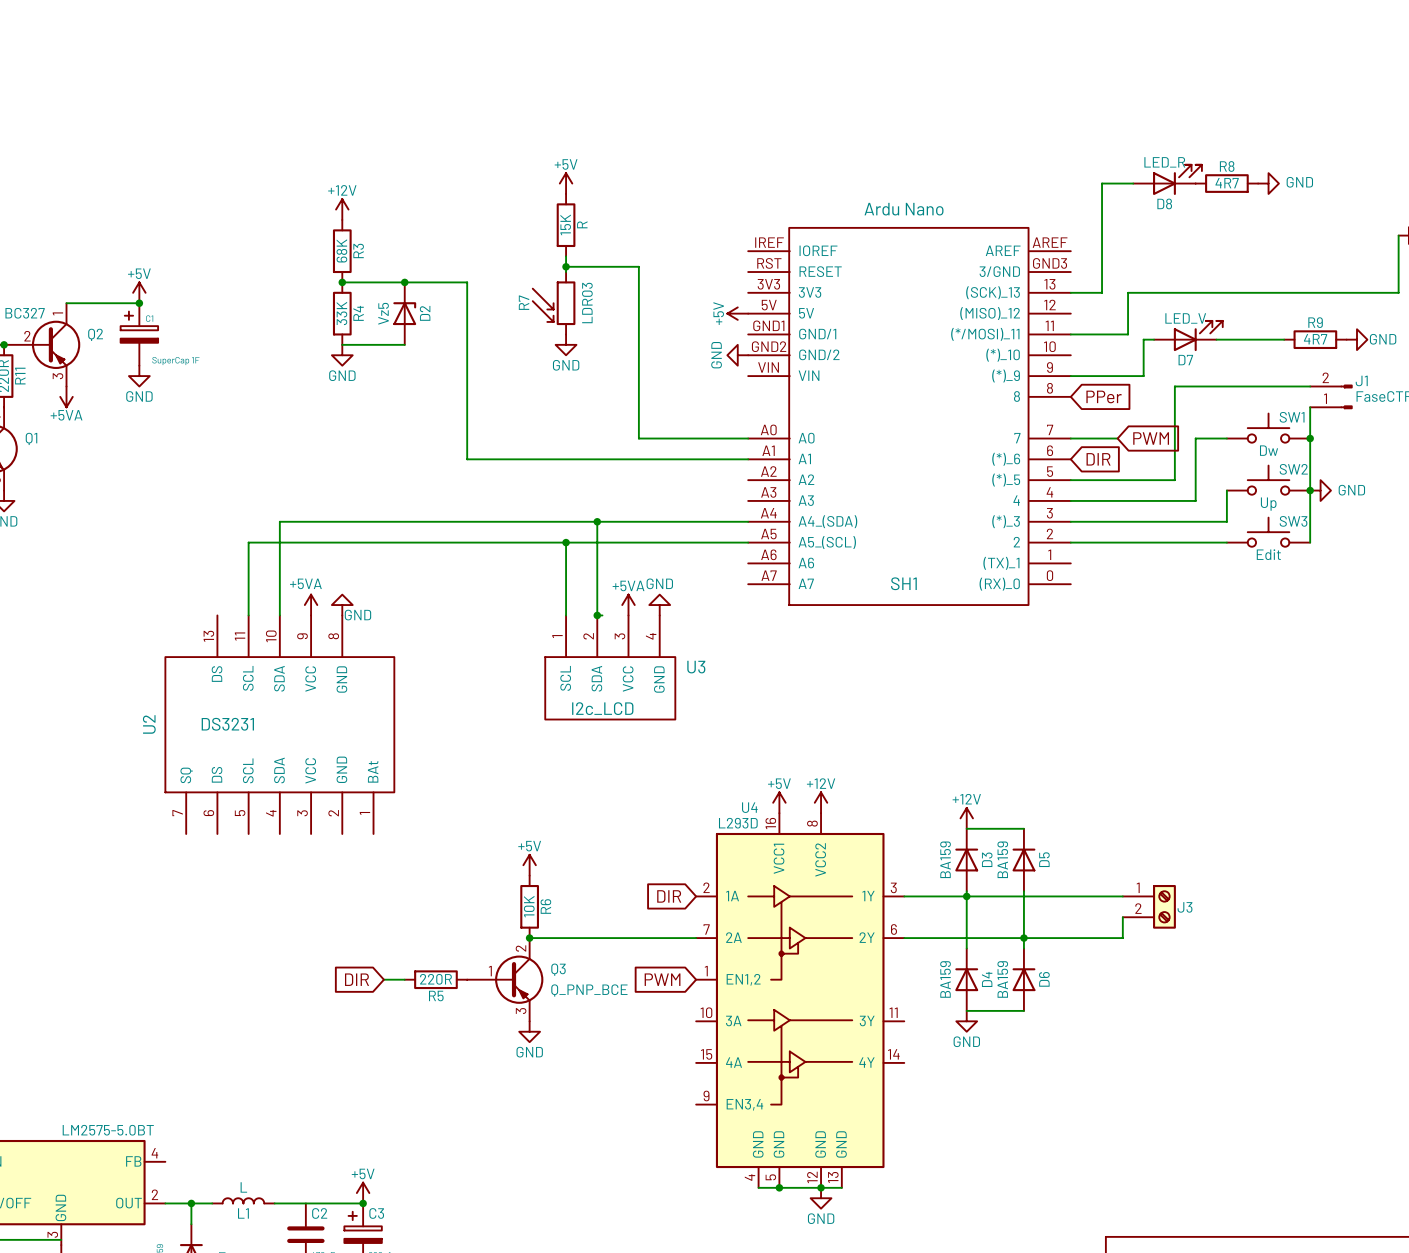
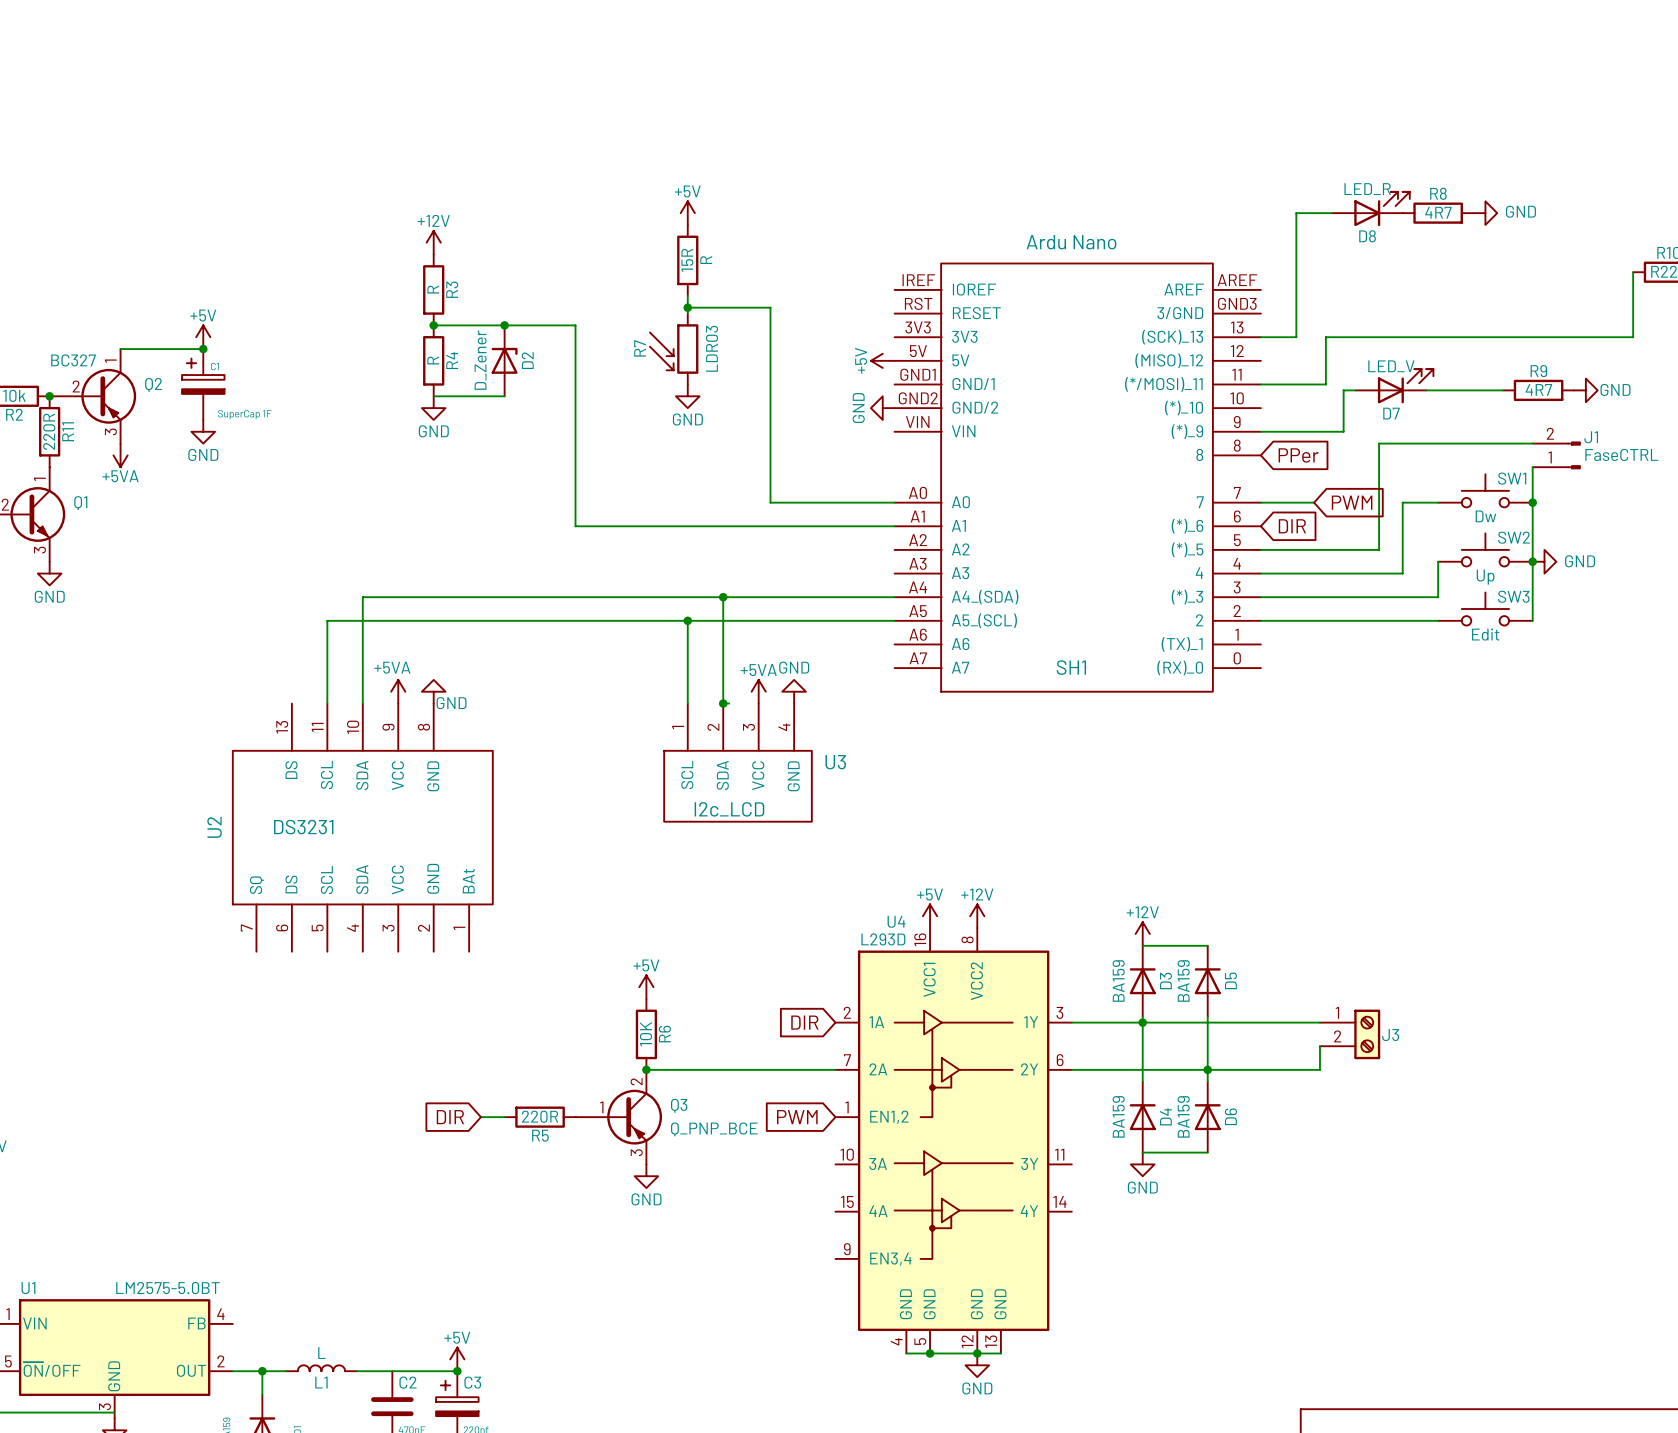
R value: 15K (565, 224) -> 15R (687, 260)
R3 value: 68K (341, 250) -> R (433, 289)
R4 value: 33K (341, 313) -> R (433, 360)
D2 value: Vz5 (383, 313) -> D_Zener (480, 360)

